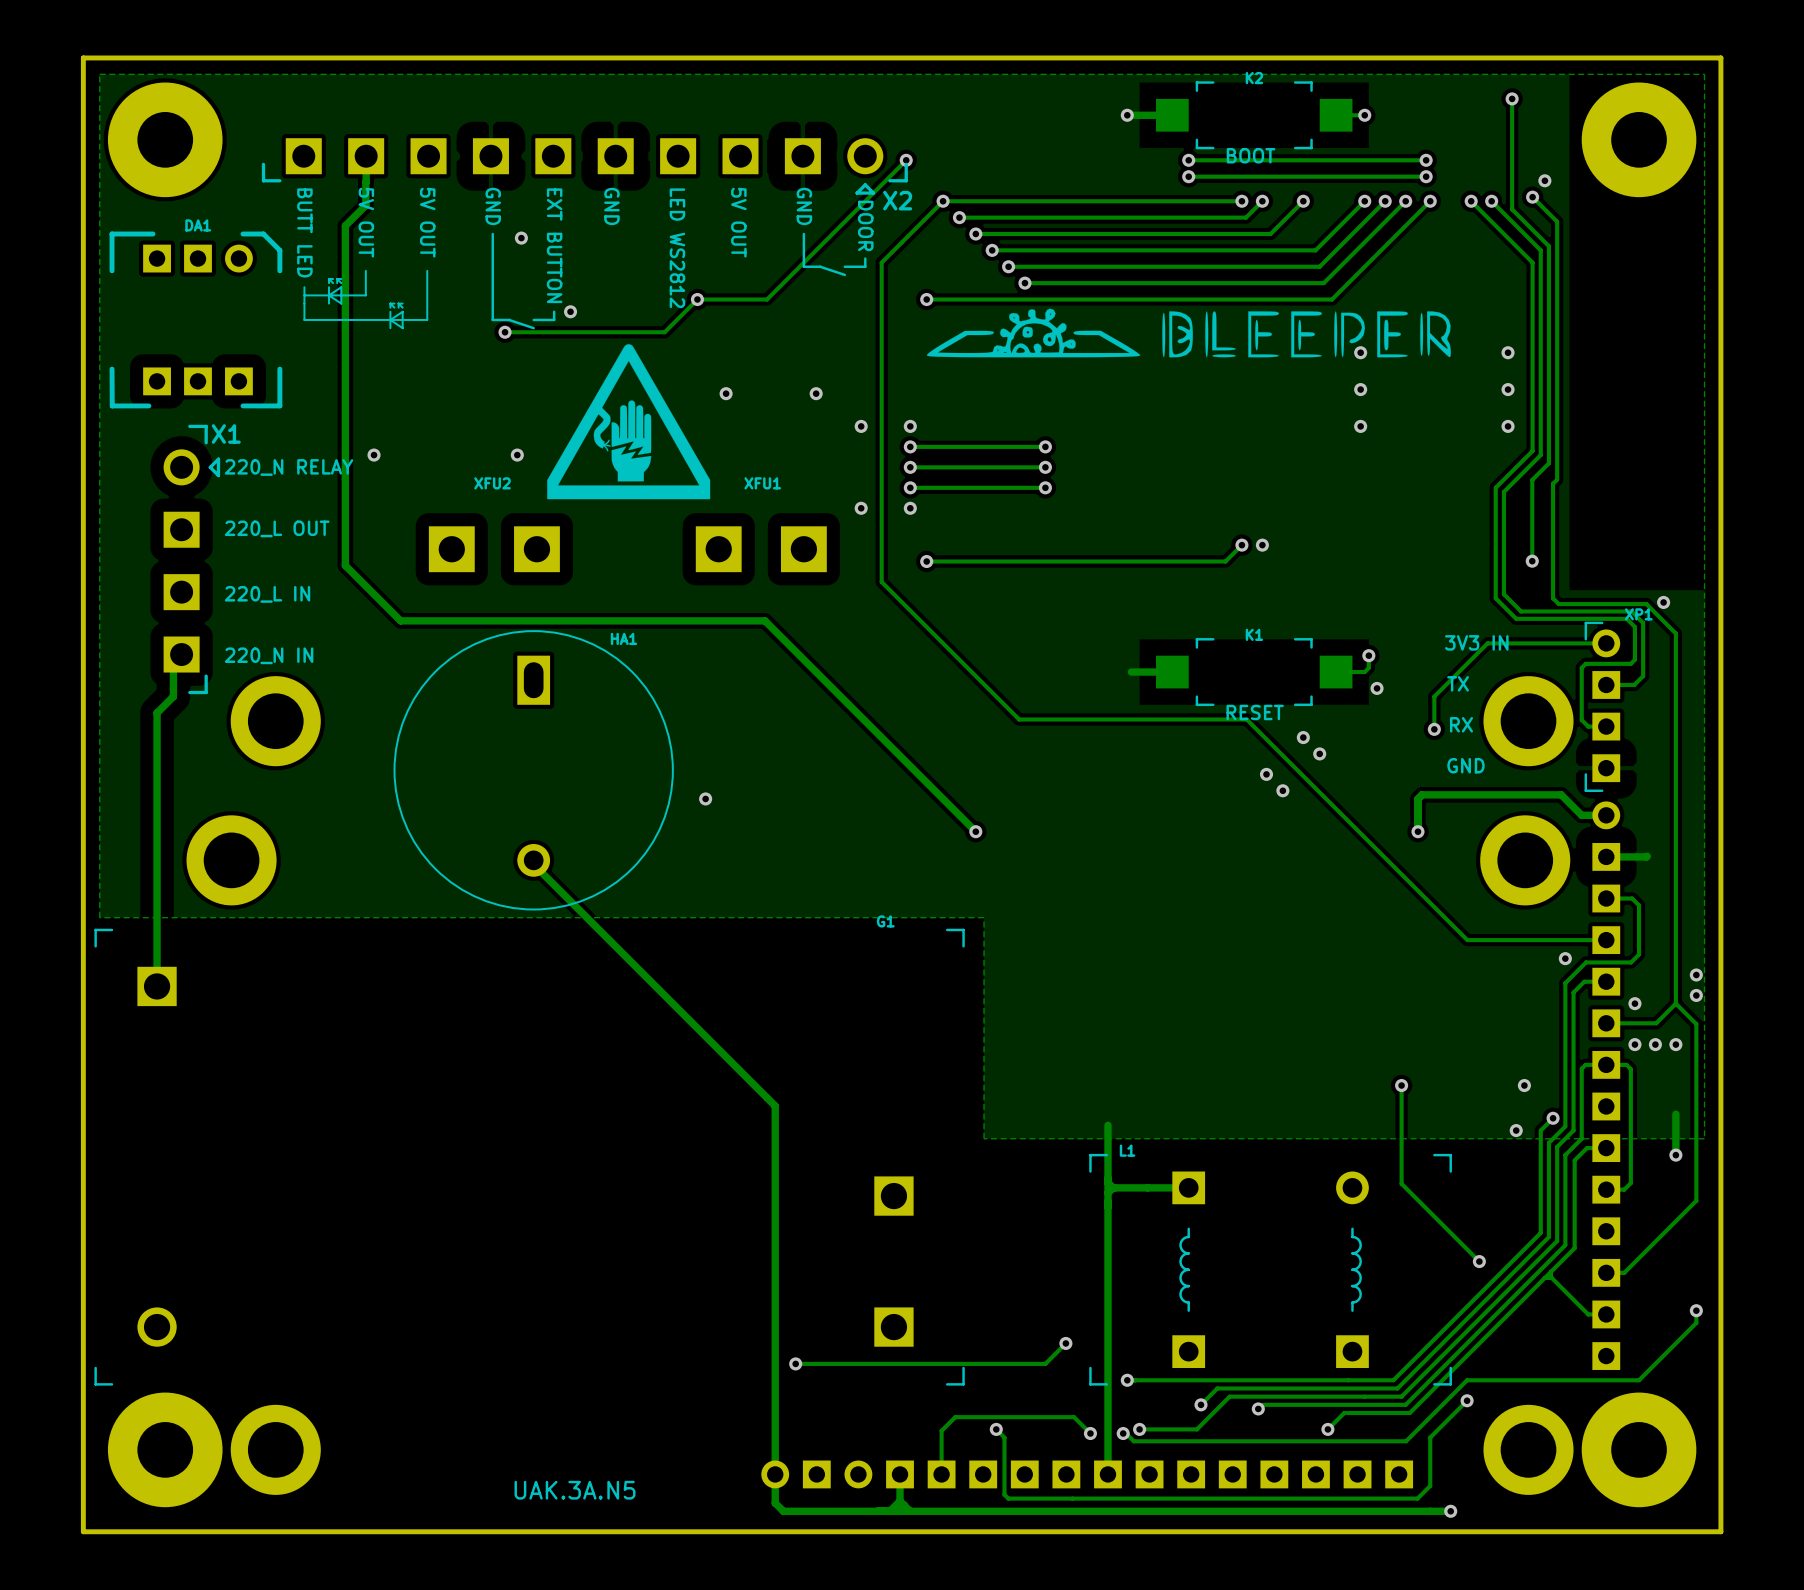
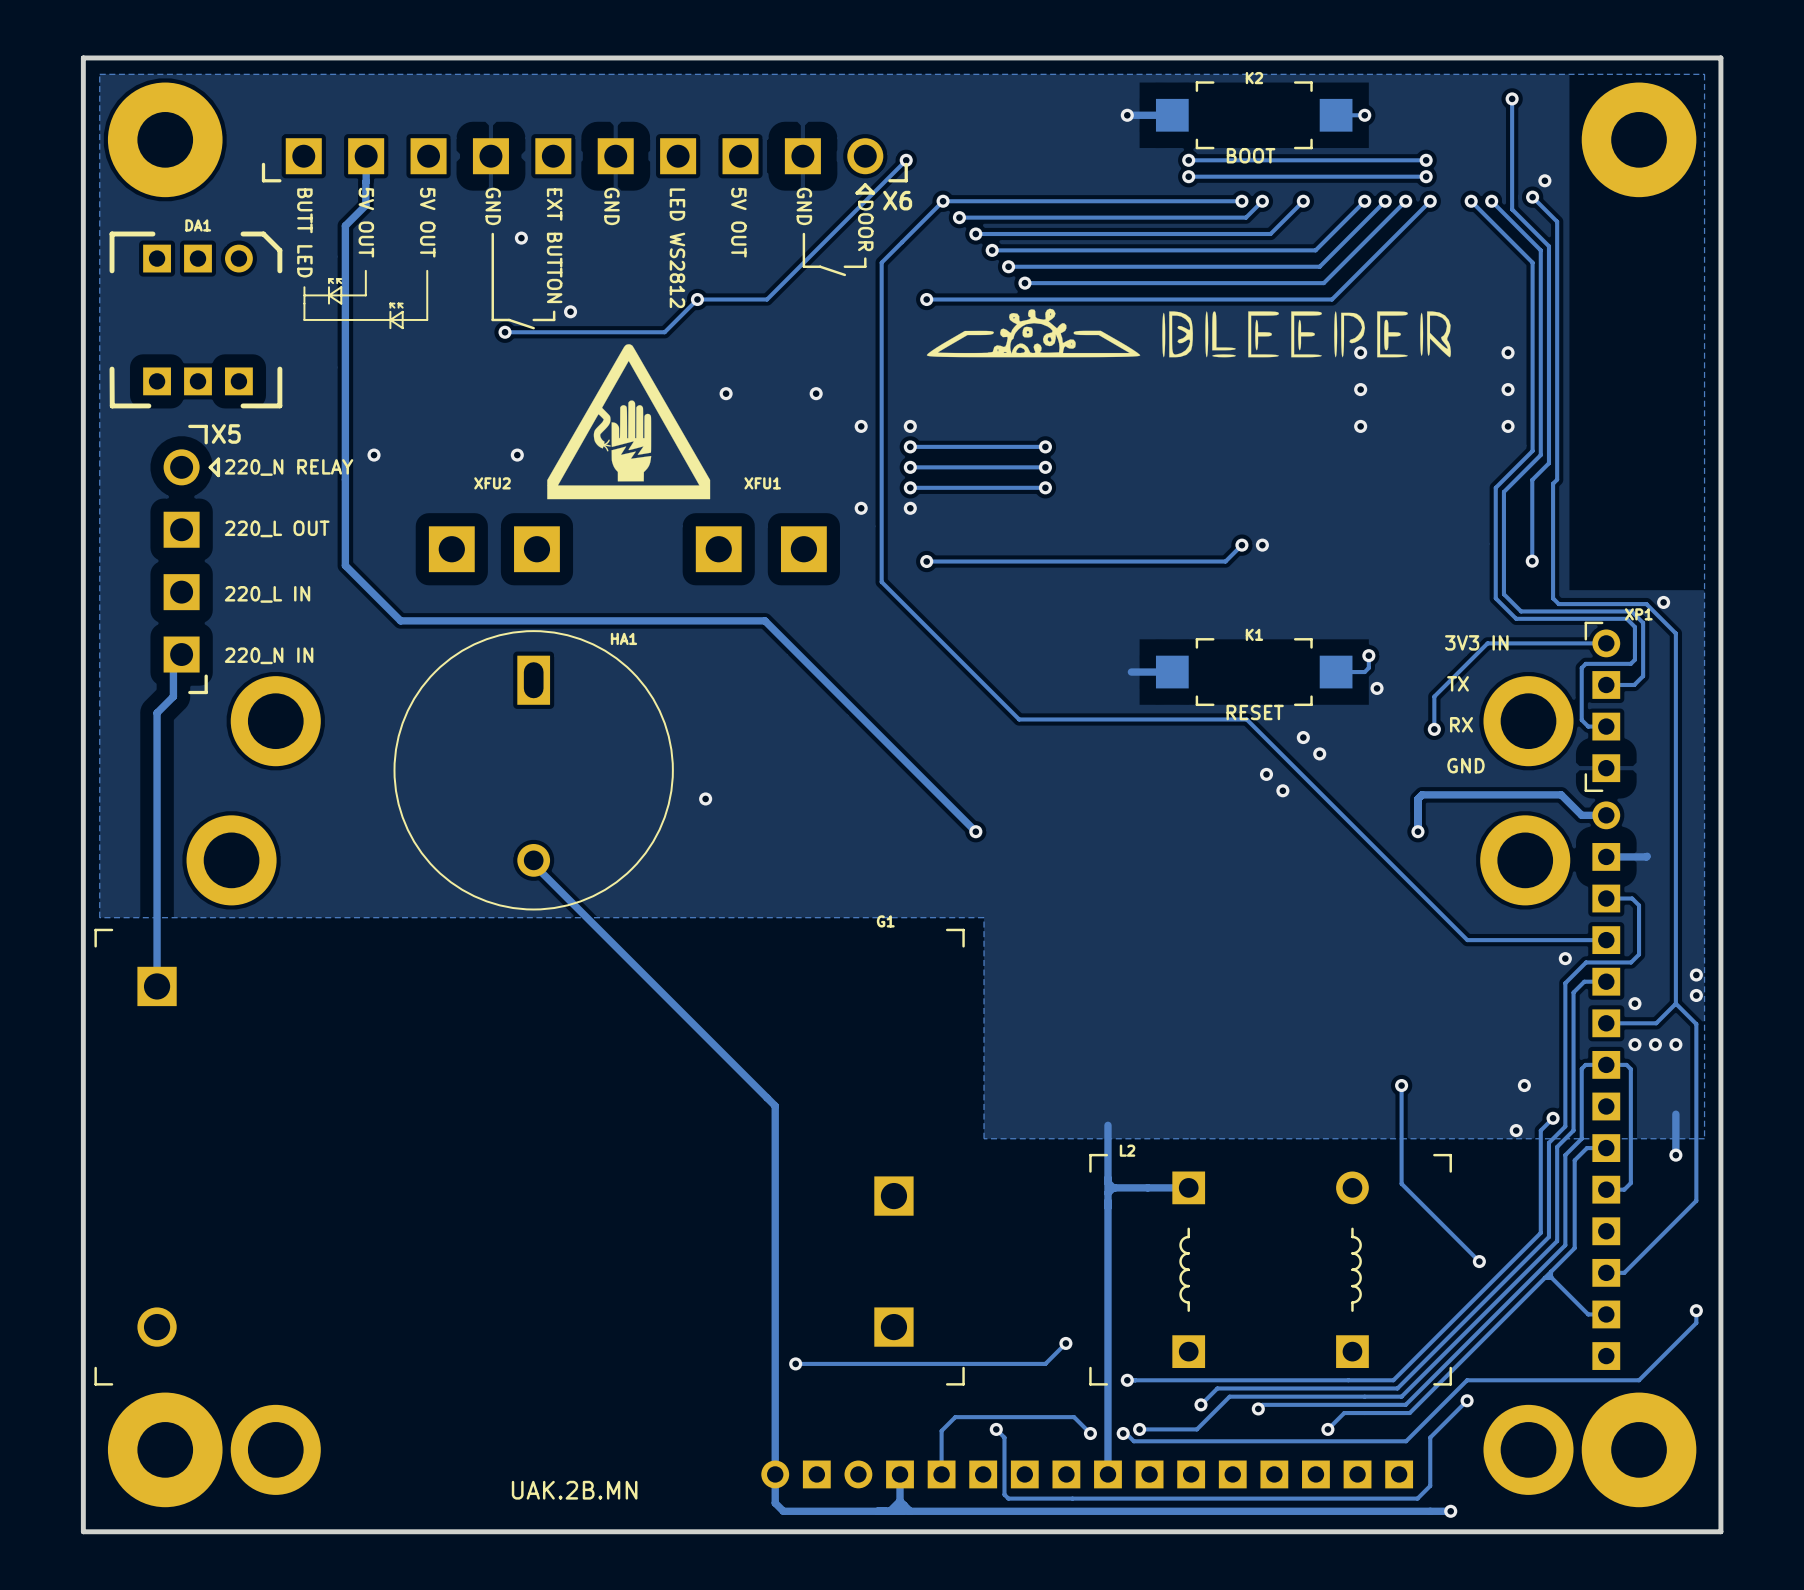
X2 name: X2 (897, 200) -> X6 (897, 200)
X1 name: X1 (226, 433) -> X5 (226, 433)
L1 name: L1 (1127, 1150) -> L2 (1127, 1150)
text: UAK.3A.N5 (575, 1490) -> UAK.2B.MN (574, 1490)

